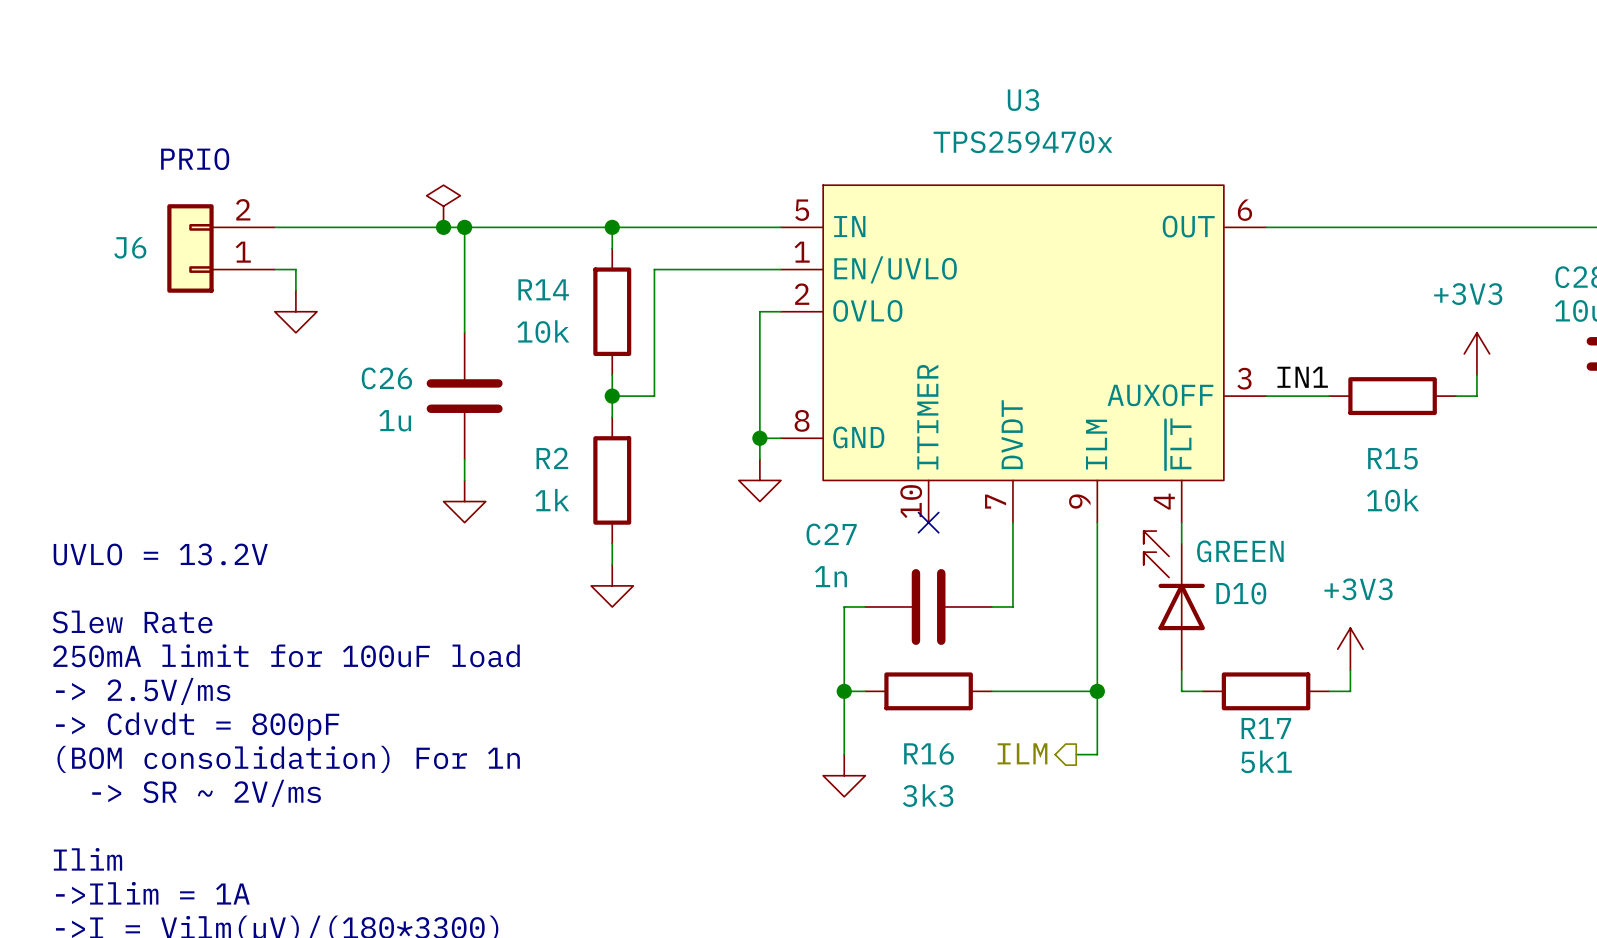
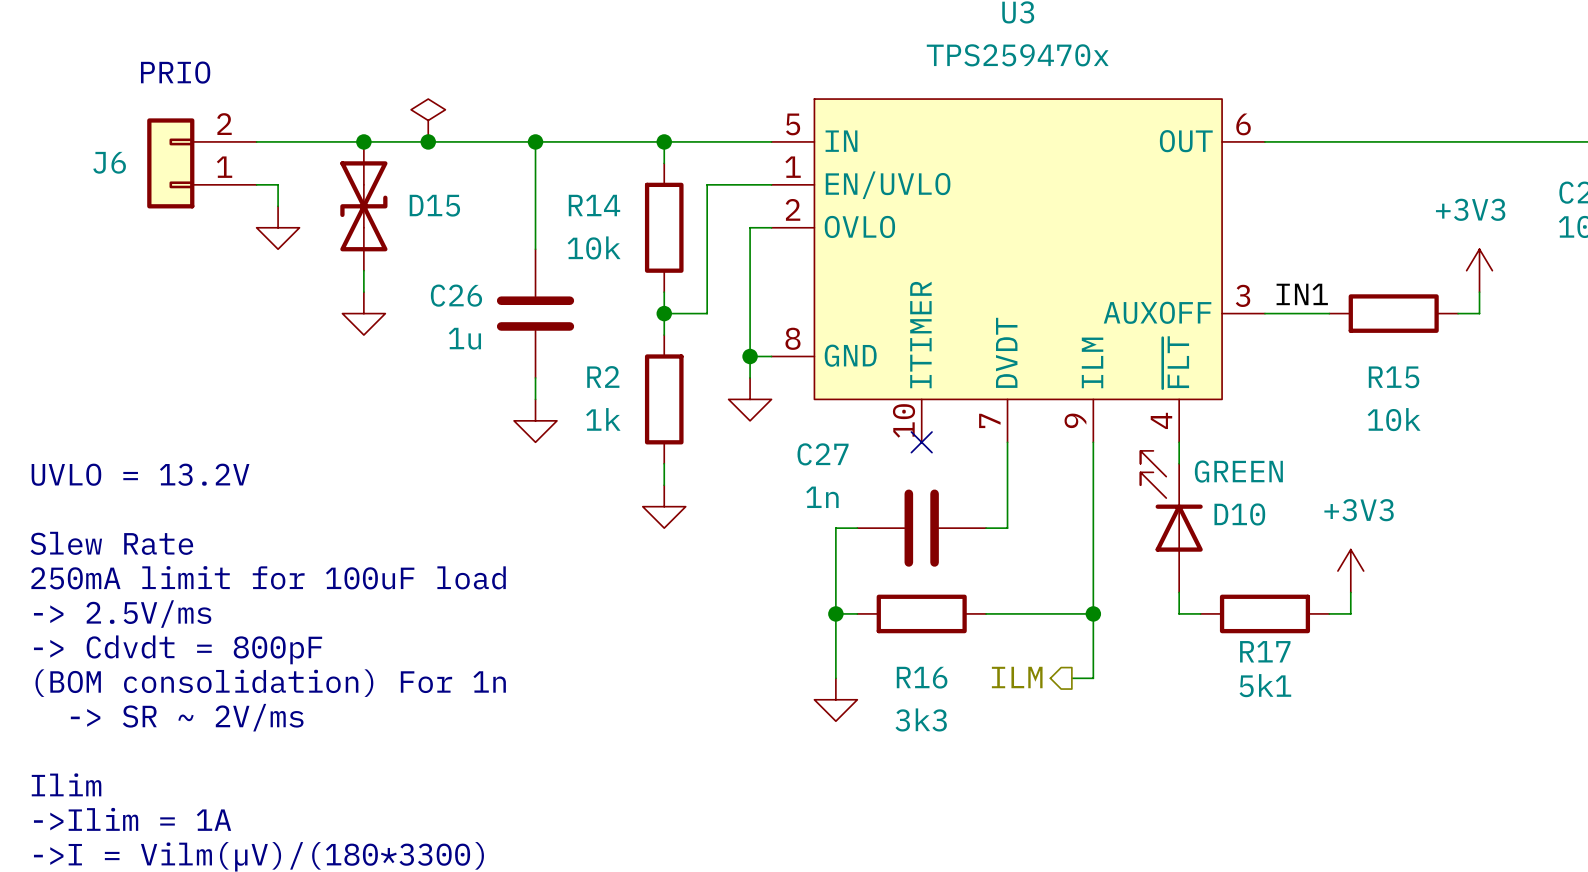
junction: none -> (363, 141)
wire: (464, 227) (464, 332) -> (535, 141) (535, 249)
junction: (464, 227) -> none
junction: none -> (535, 141)
wire: (612, 227) (612, 248) -> (664, 141) (664, 163)
junction: (612, 227) -> none
junction: none -> (664, 141)
wire: (717, 269) (654, 269) (654, 396) (612, 396) -> (707, 184) (707, 313) (664, 313)
D15: none -> (363, 206)
R14 position: (612, 311) -> (664, 227)
wire: none -> (363, 270) (363, 292)
wire: (612, 375) (612, 417) -> (664, 292) (664, 335)
power symbol: none -> (363, 313)
C26 position: (464, 396) -> (535, 313)
junction position: (612, 396) -> (664, 313)
wire: (464, 459) (464, 480) -> (535, 377) (535, 399)
R2 position: (612, 480) -> (664, 399)
power symbol: (464, 501) -> none
power symbol: none -> (535, 420)
wire: (612, 543) (612, 564) -> (664, 463) (664, 485)
power symbol: (612, 585) -> none
power symbol: none -> (664, 506)

